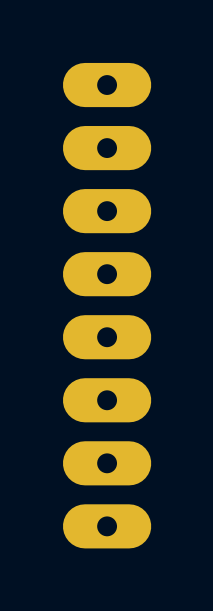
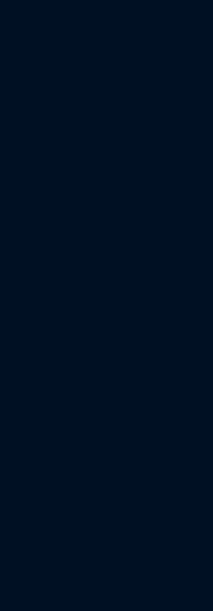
part: (107, 305) -> none

